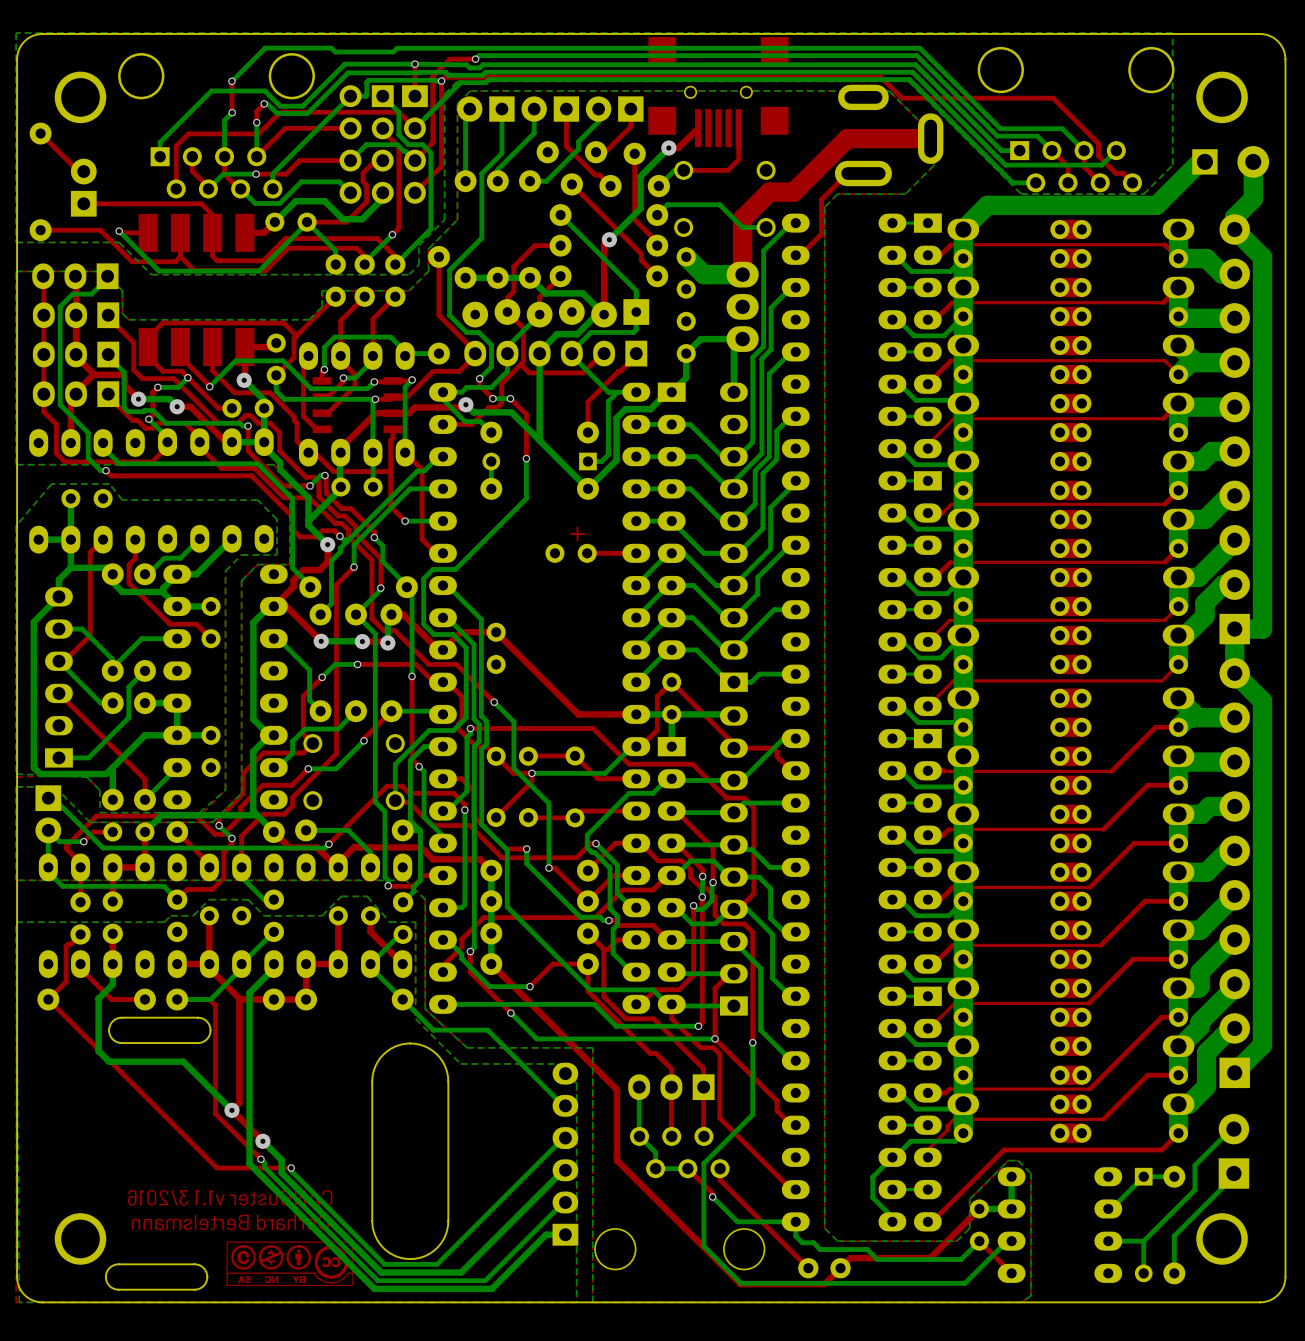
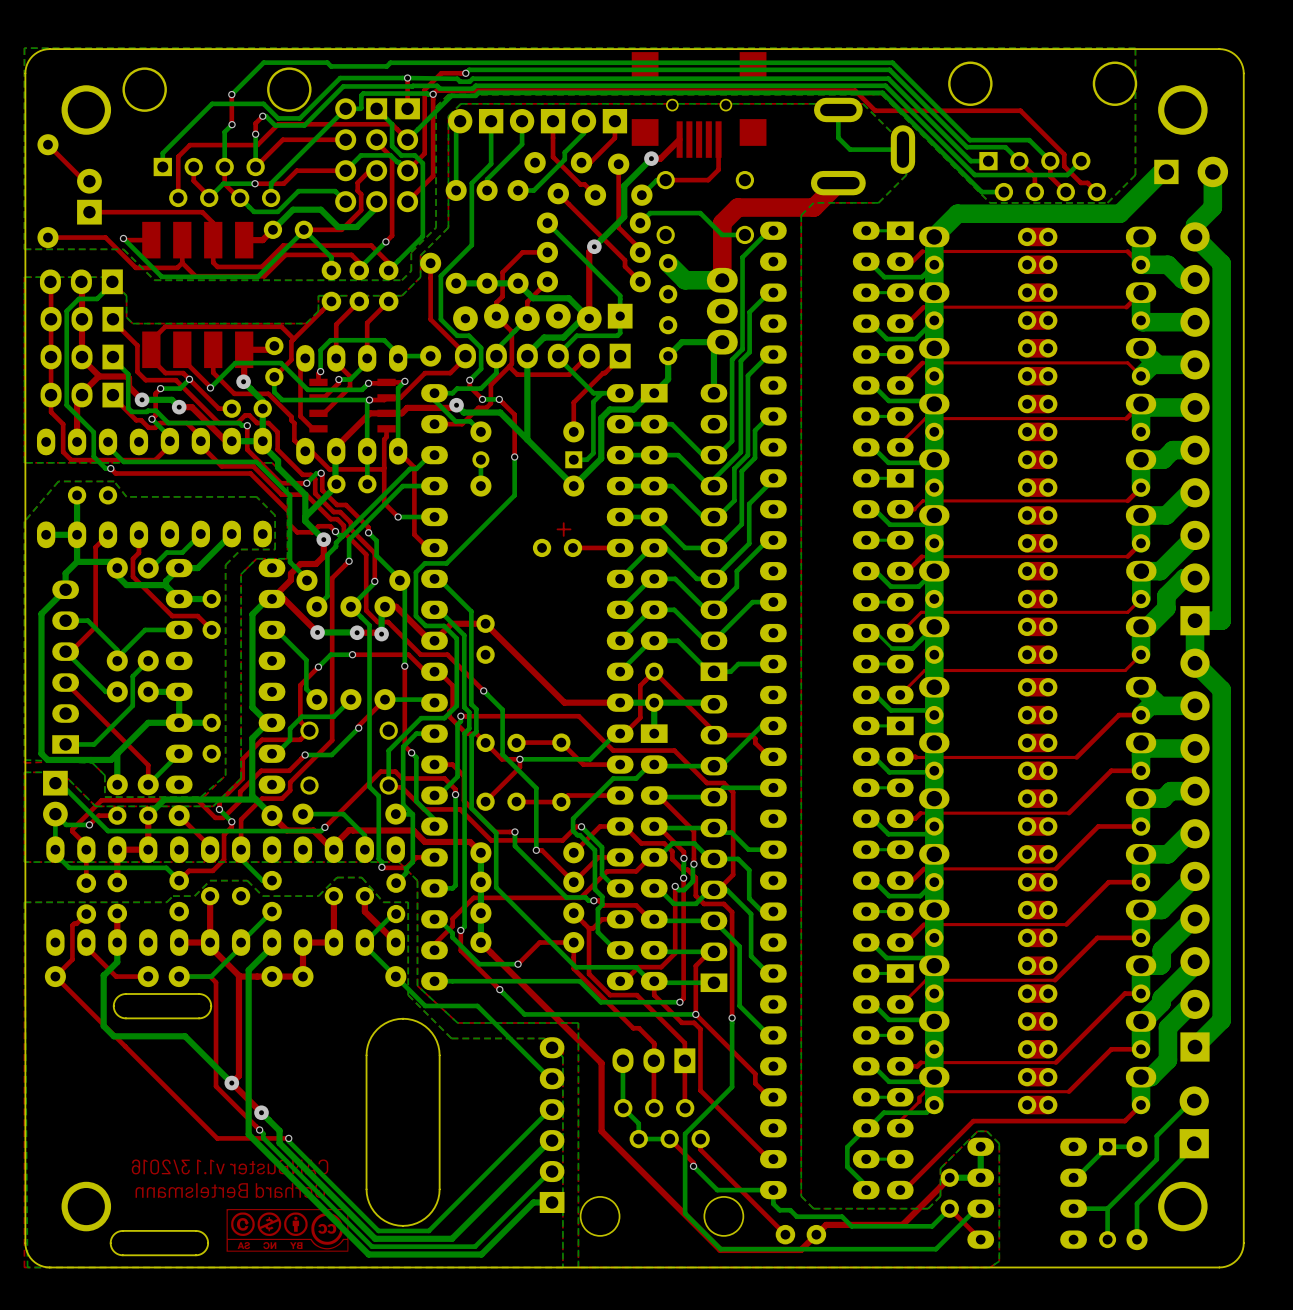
bottom track: none -> (838, 109) (838, 137) (850, 149) (902, 149)
top track: (930, 138) (847, 138) (793, 192) (769, 192) (742, 218) -> (838, 183) (813, 207) (737, 207) (722, 223) (722, 226)
top track: (847, 173) (821, 199) (821, 233) (800, 255) -> none

